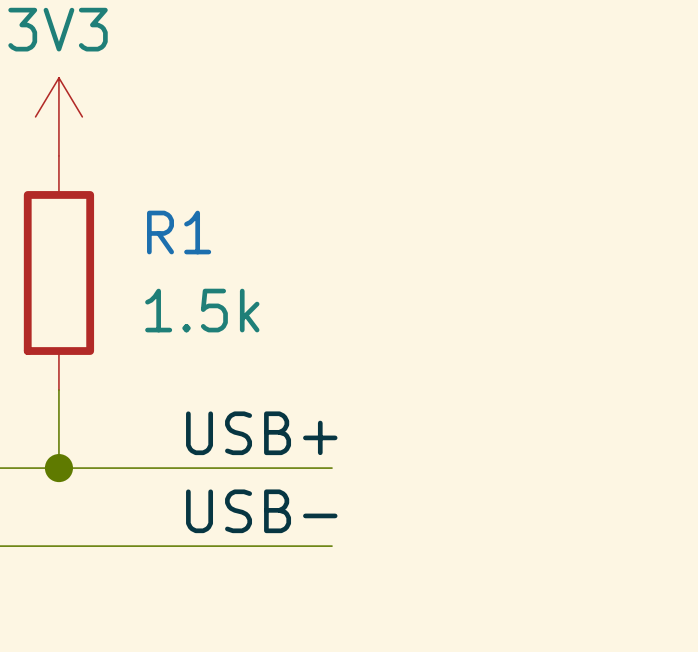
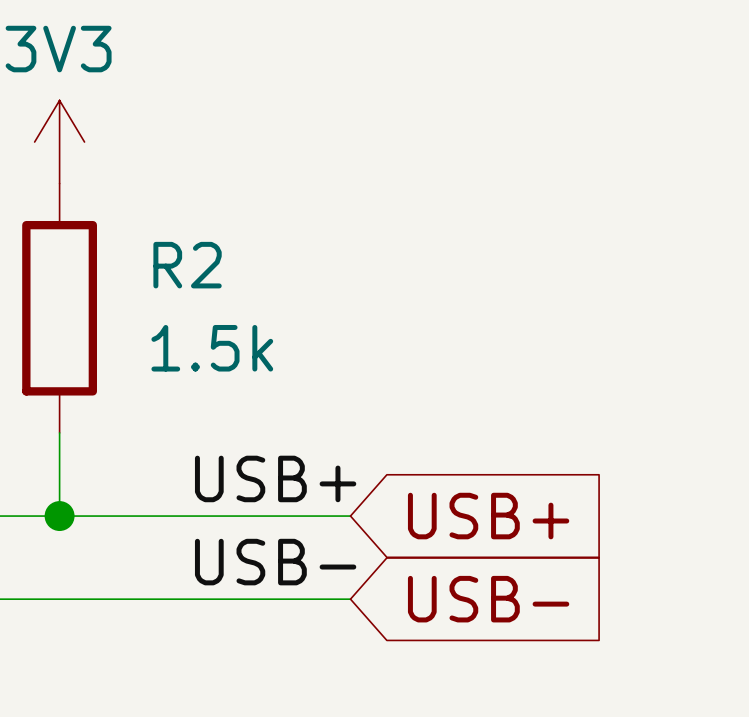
R1 name: R1 (179, 232) -> R2 (187, 265)
global label: none -> USB+ (488, 516)
global label: none -> USB- (488, 599)

